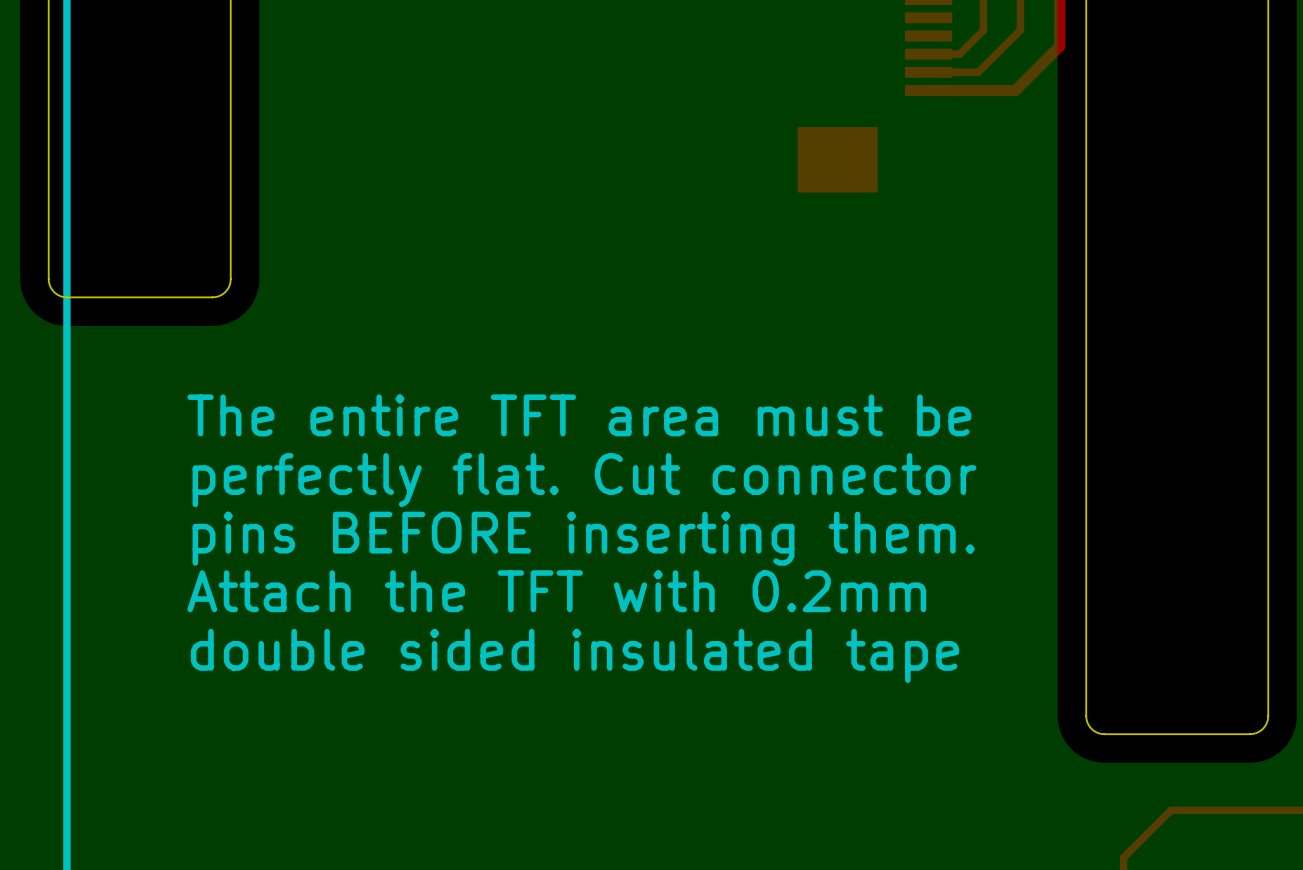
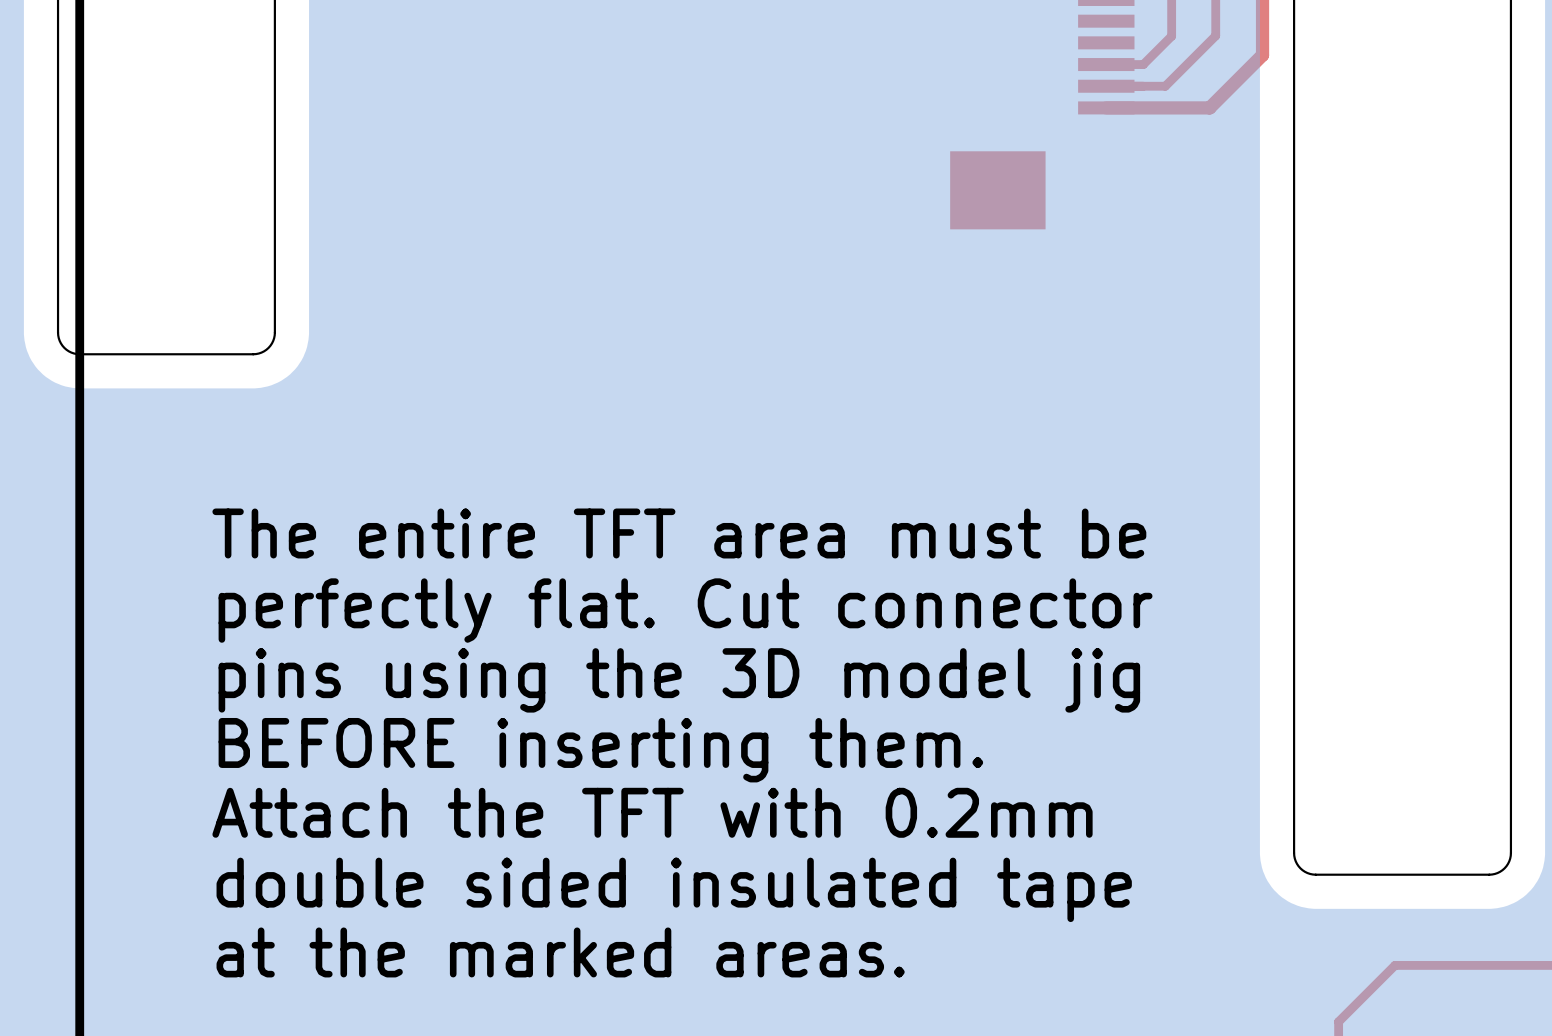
text position: The entire TFT area must be (579, 415) -> The entire TFT area must be (679, 533)
text position: perfectly flat. Cut connector (584, 480) -> perfectly flat. Cut connector (685, 610)
text: pins BEFORE inserting them. (583, 538) -> pins using the 3D model jig (679, 680)
text position: Attach the TFT with 0.2mm (556, 591) -> Attach the TFT with 0.2mm (652, 812)
text: none -> BEFORE inserting them. (600, 750)
text position: double sided insulated tape (575, 655) -> double sided insulated tape (674, 889)
text: none -> at the marked areas. (560, 952)

